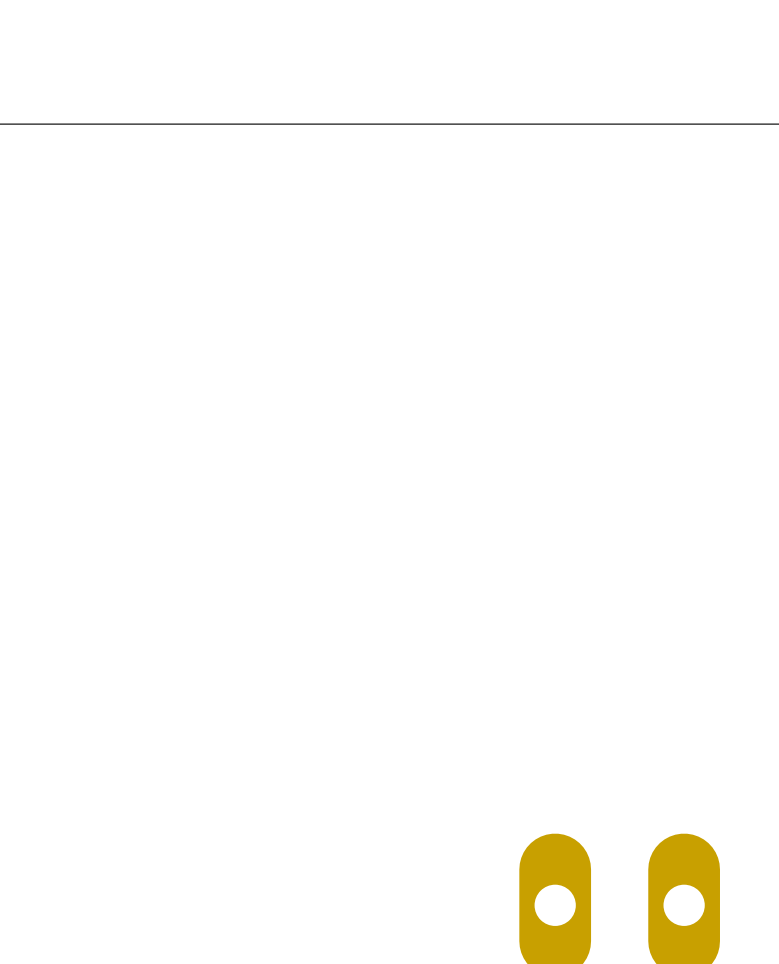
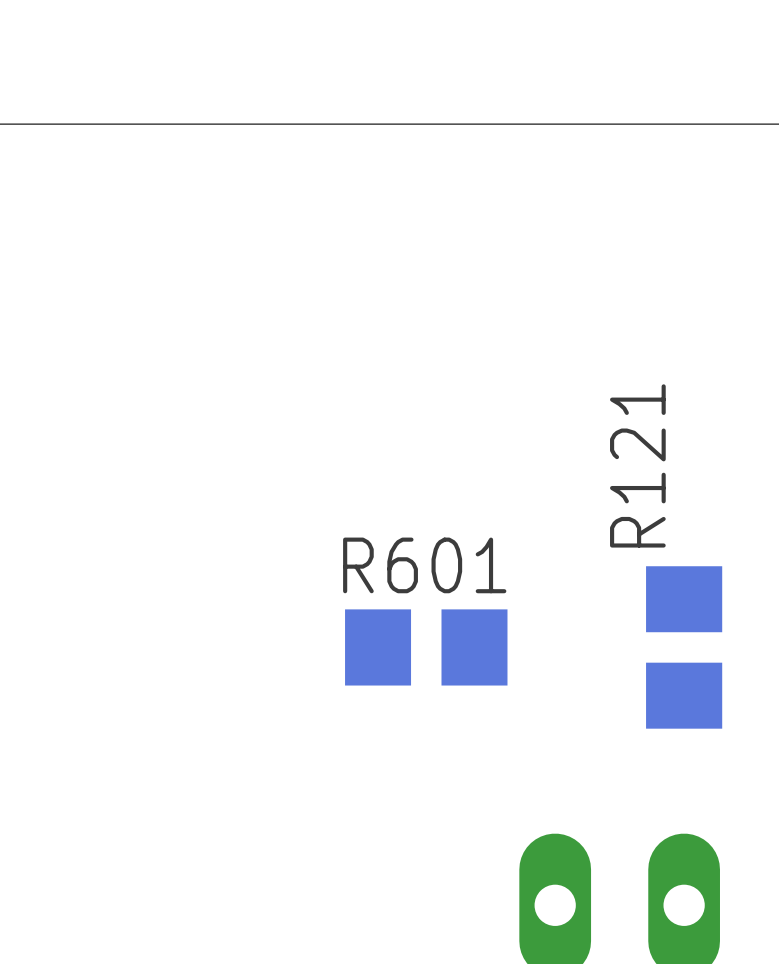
R601: none -> (426, 647)
R121: none -> (684, 647)

